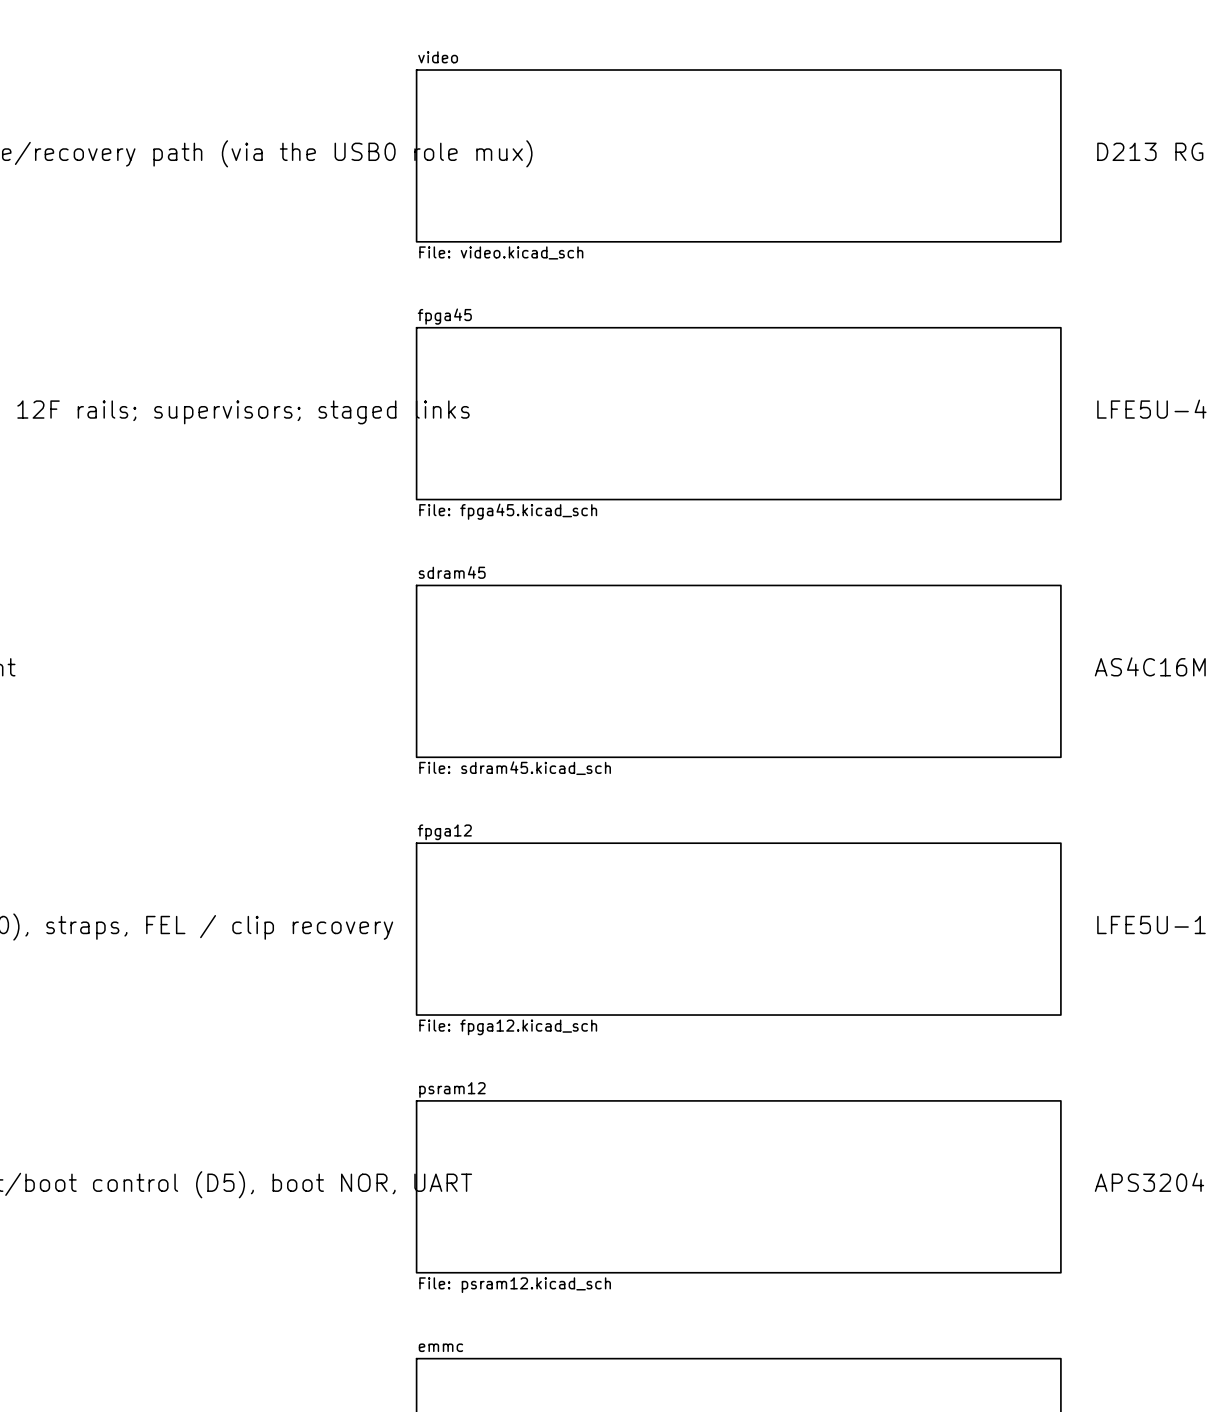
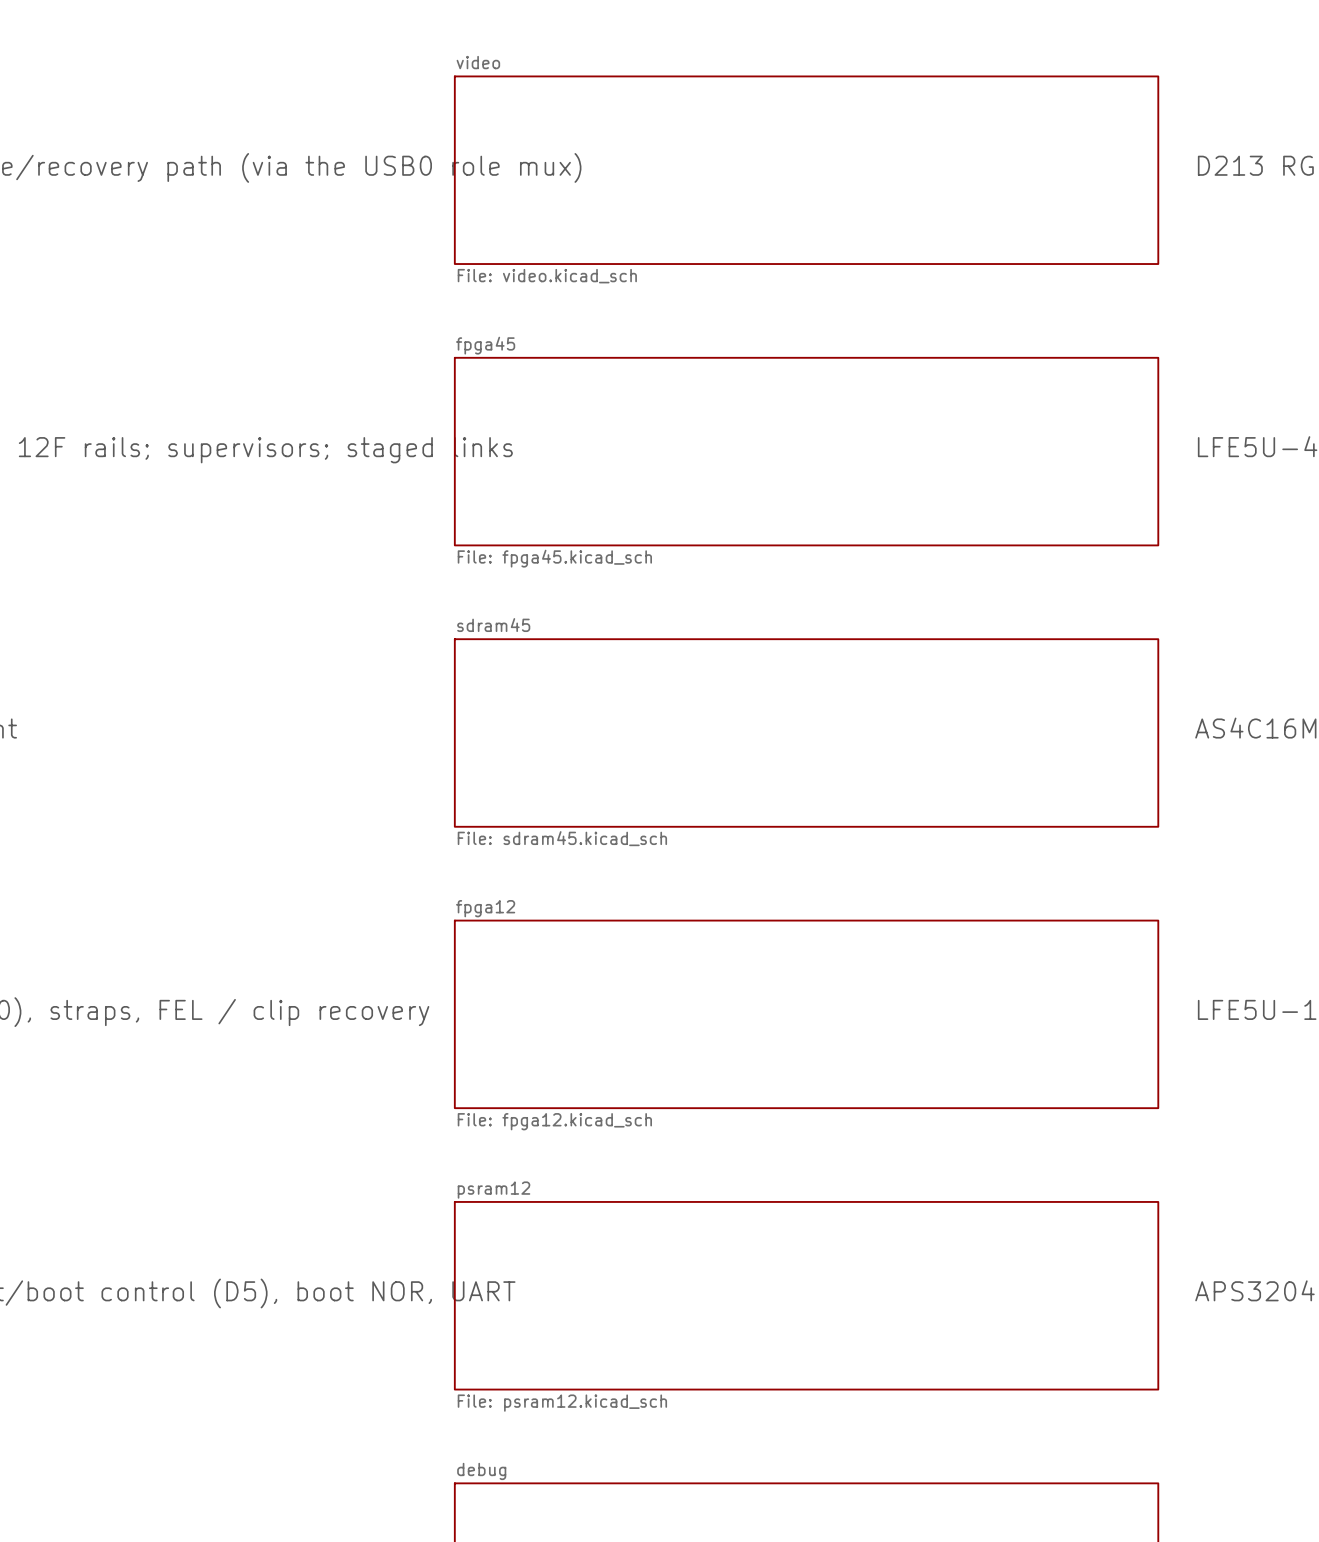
sheet emmc name: emmc (440, 1347) -> debug (481, 1471)

